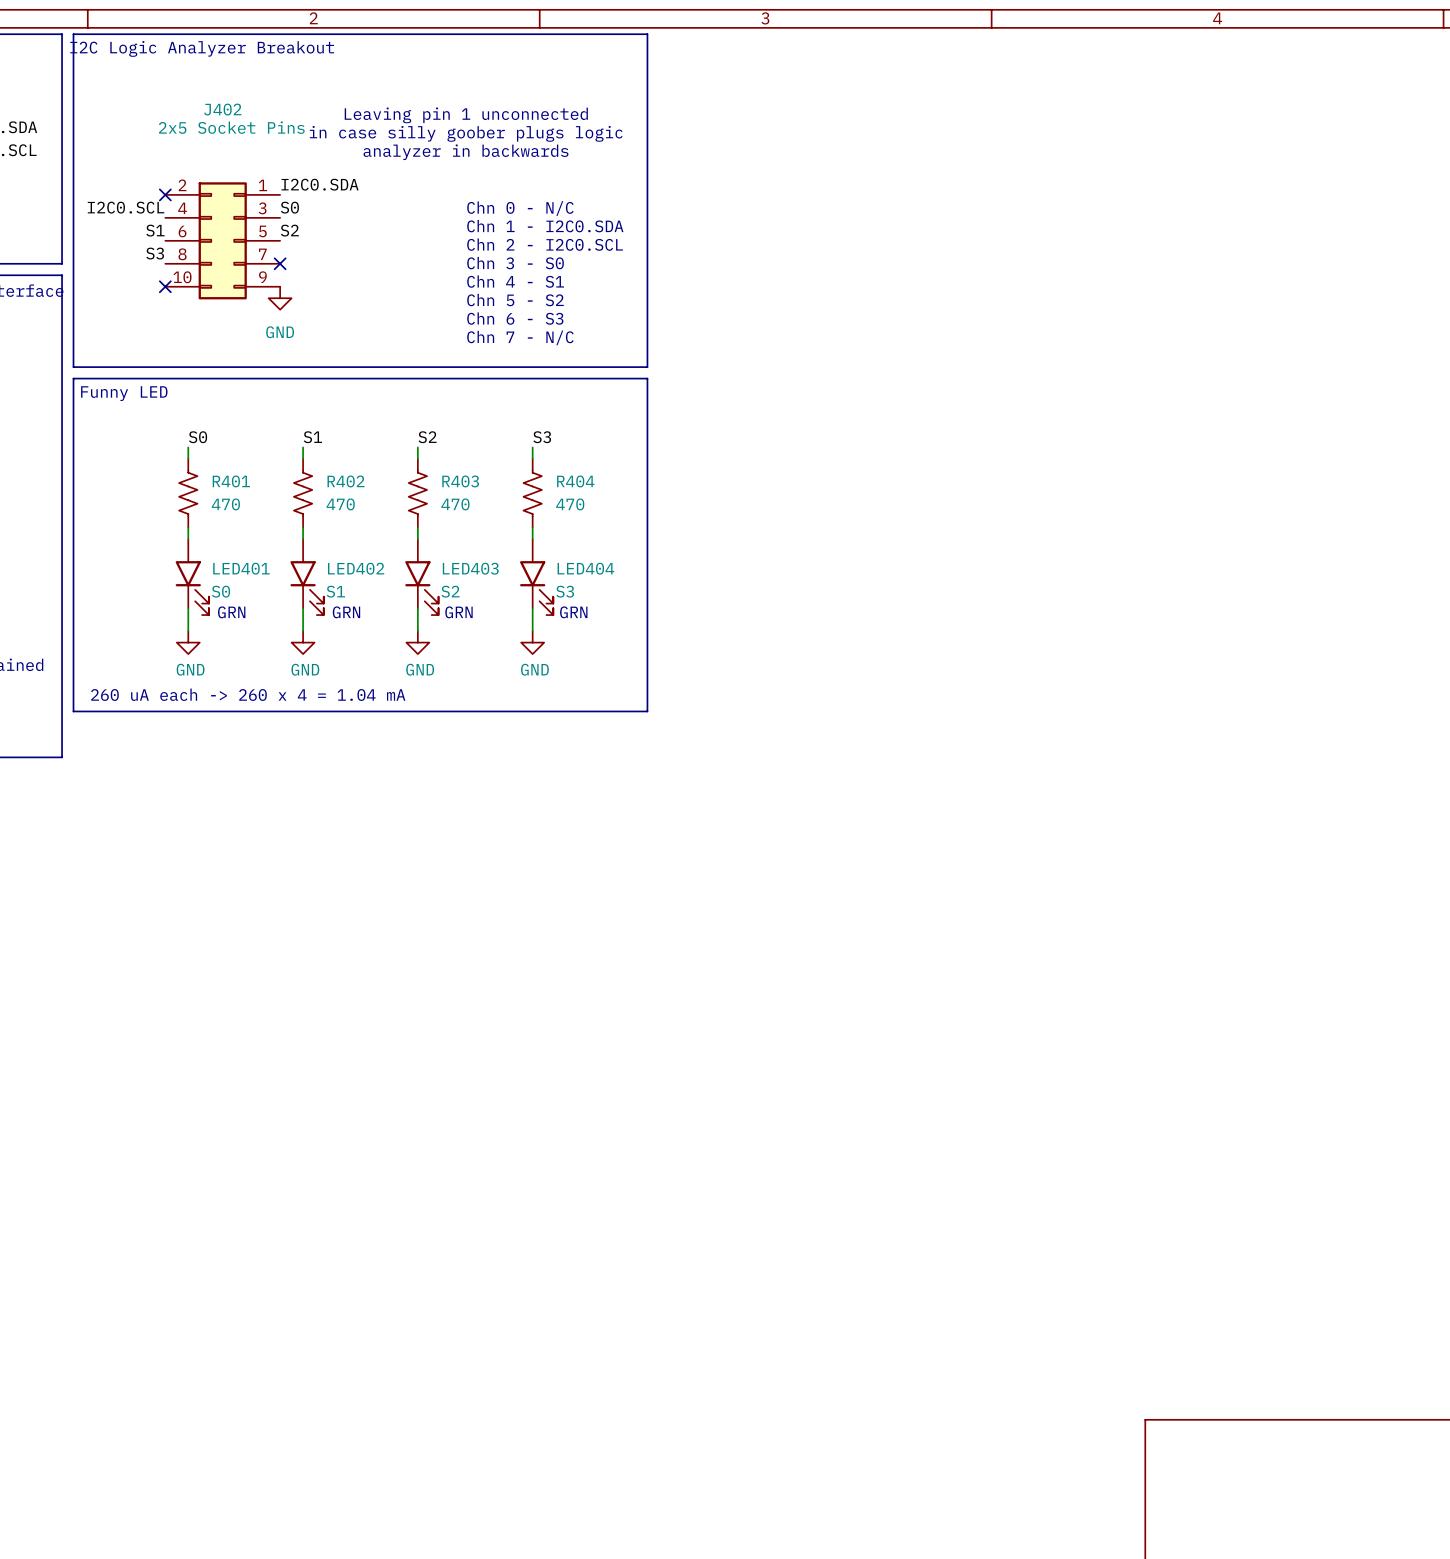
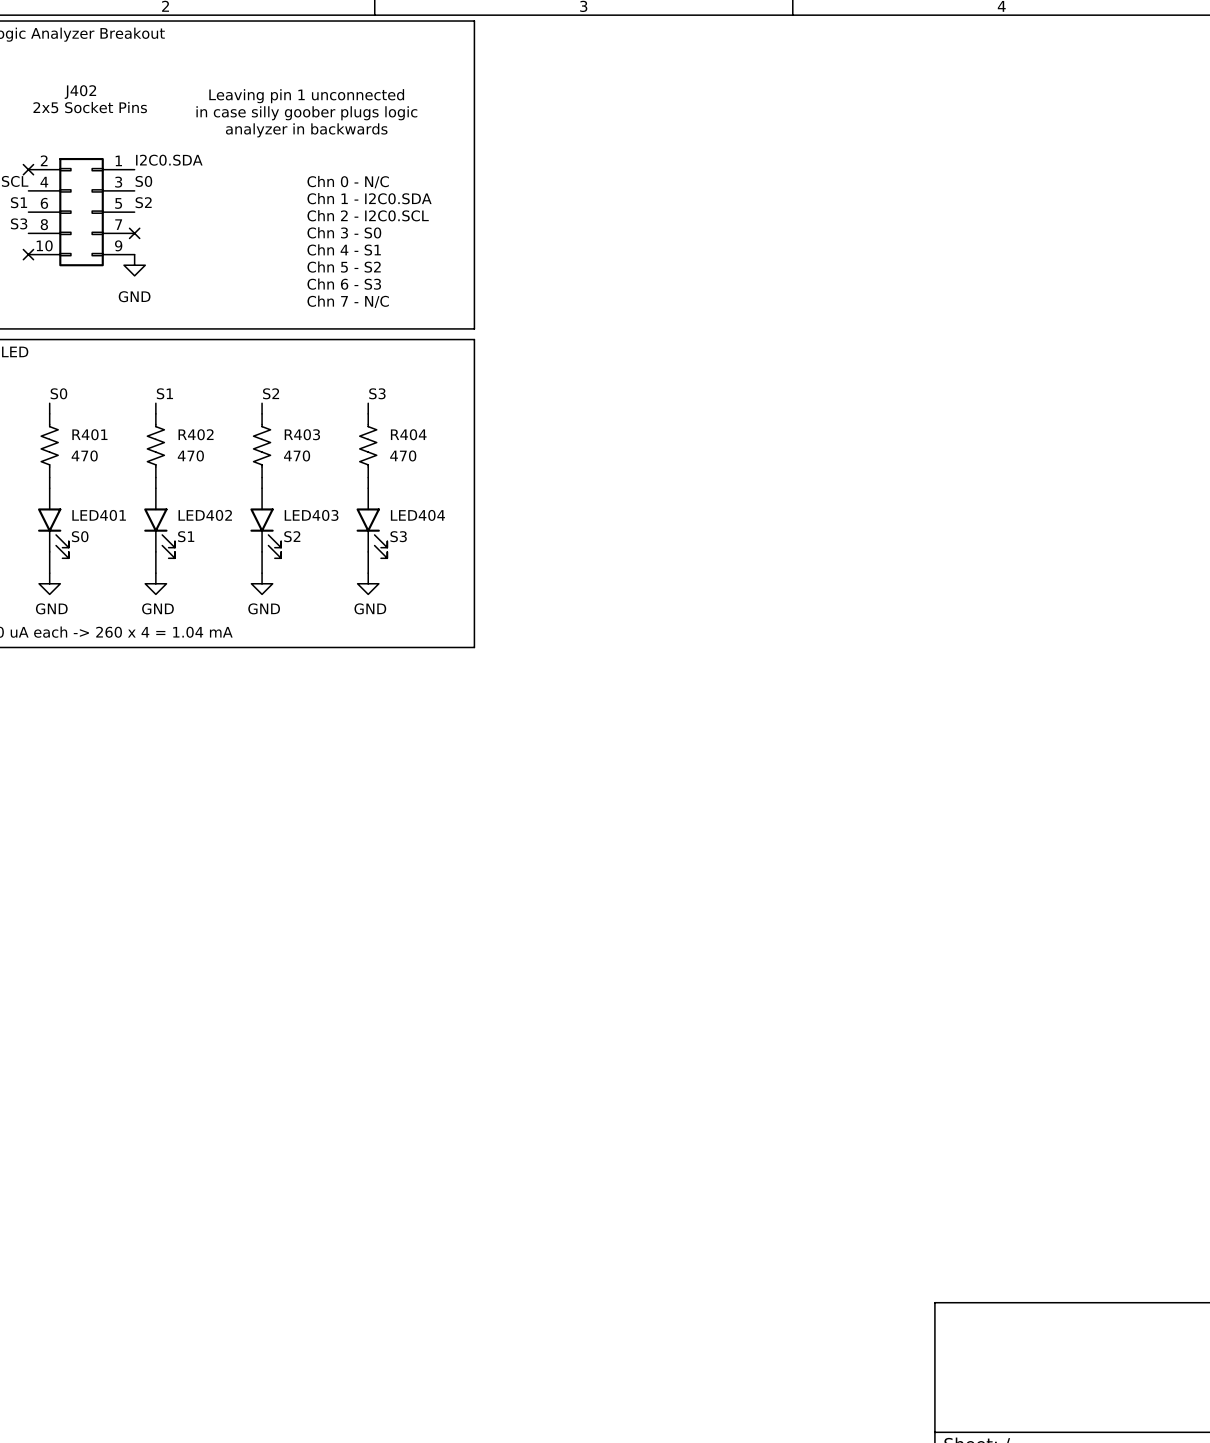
text: GRN (231, 612) -> none
text: GRN (346, 612) -> none
text: GRN (458, 612) -> none
text: GRN (573, 612) -> none

